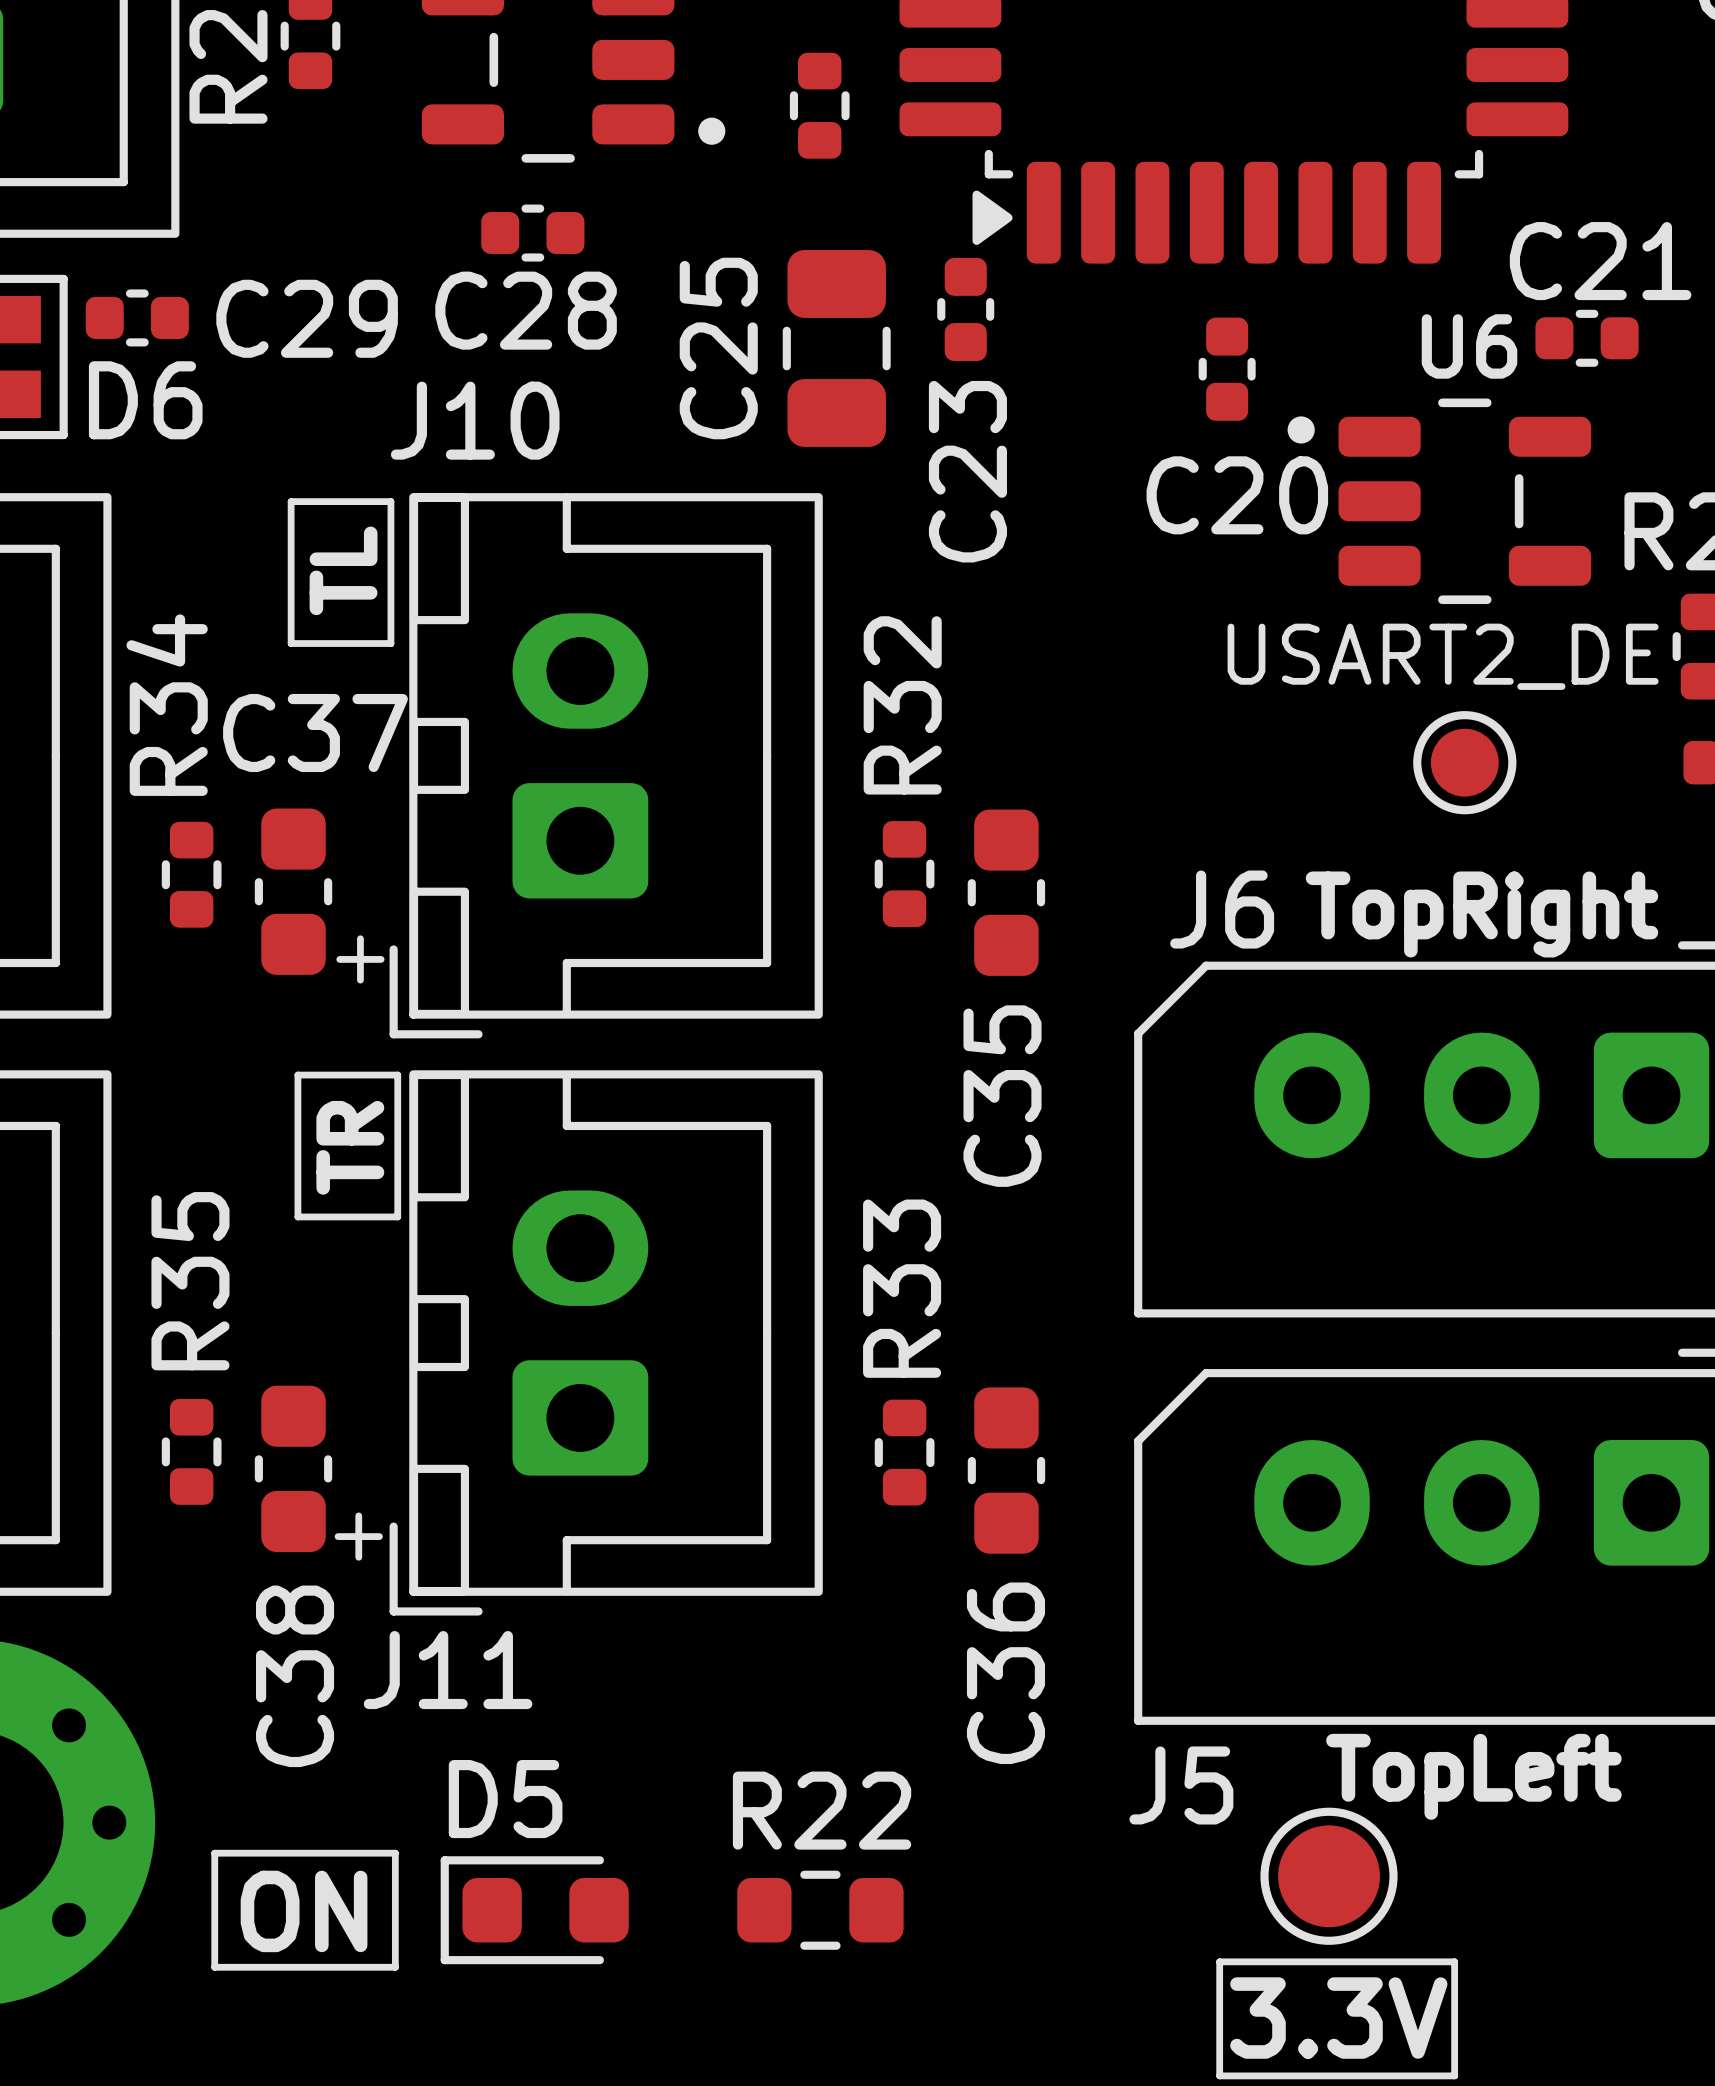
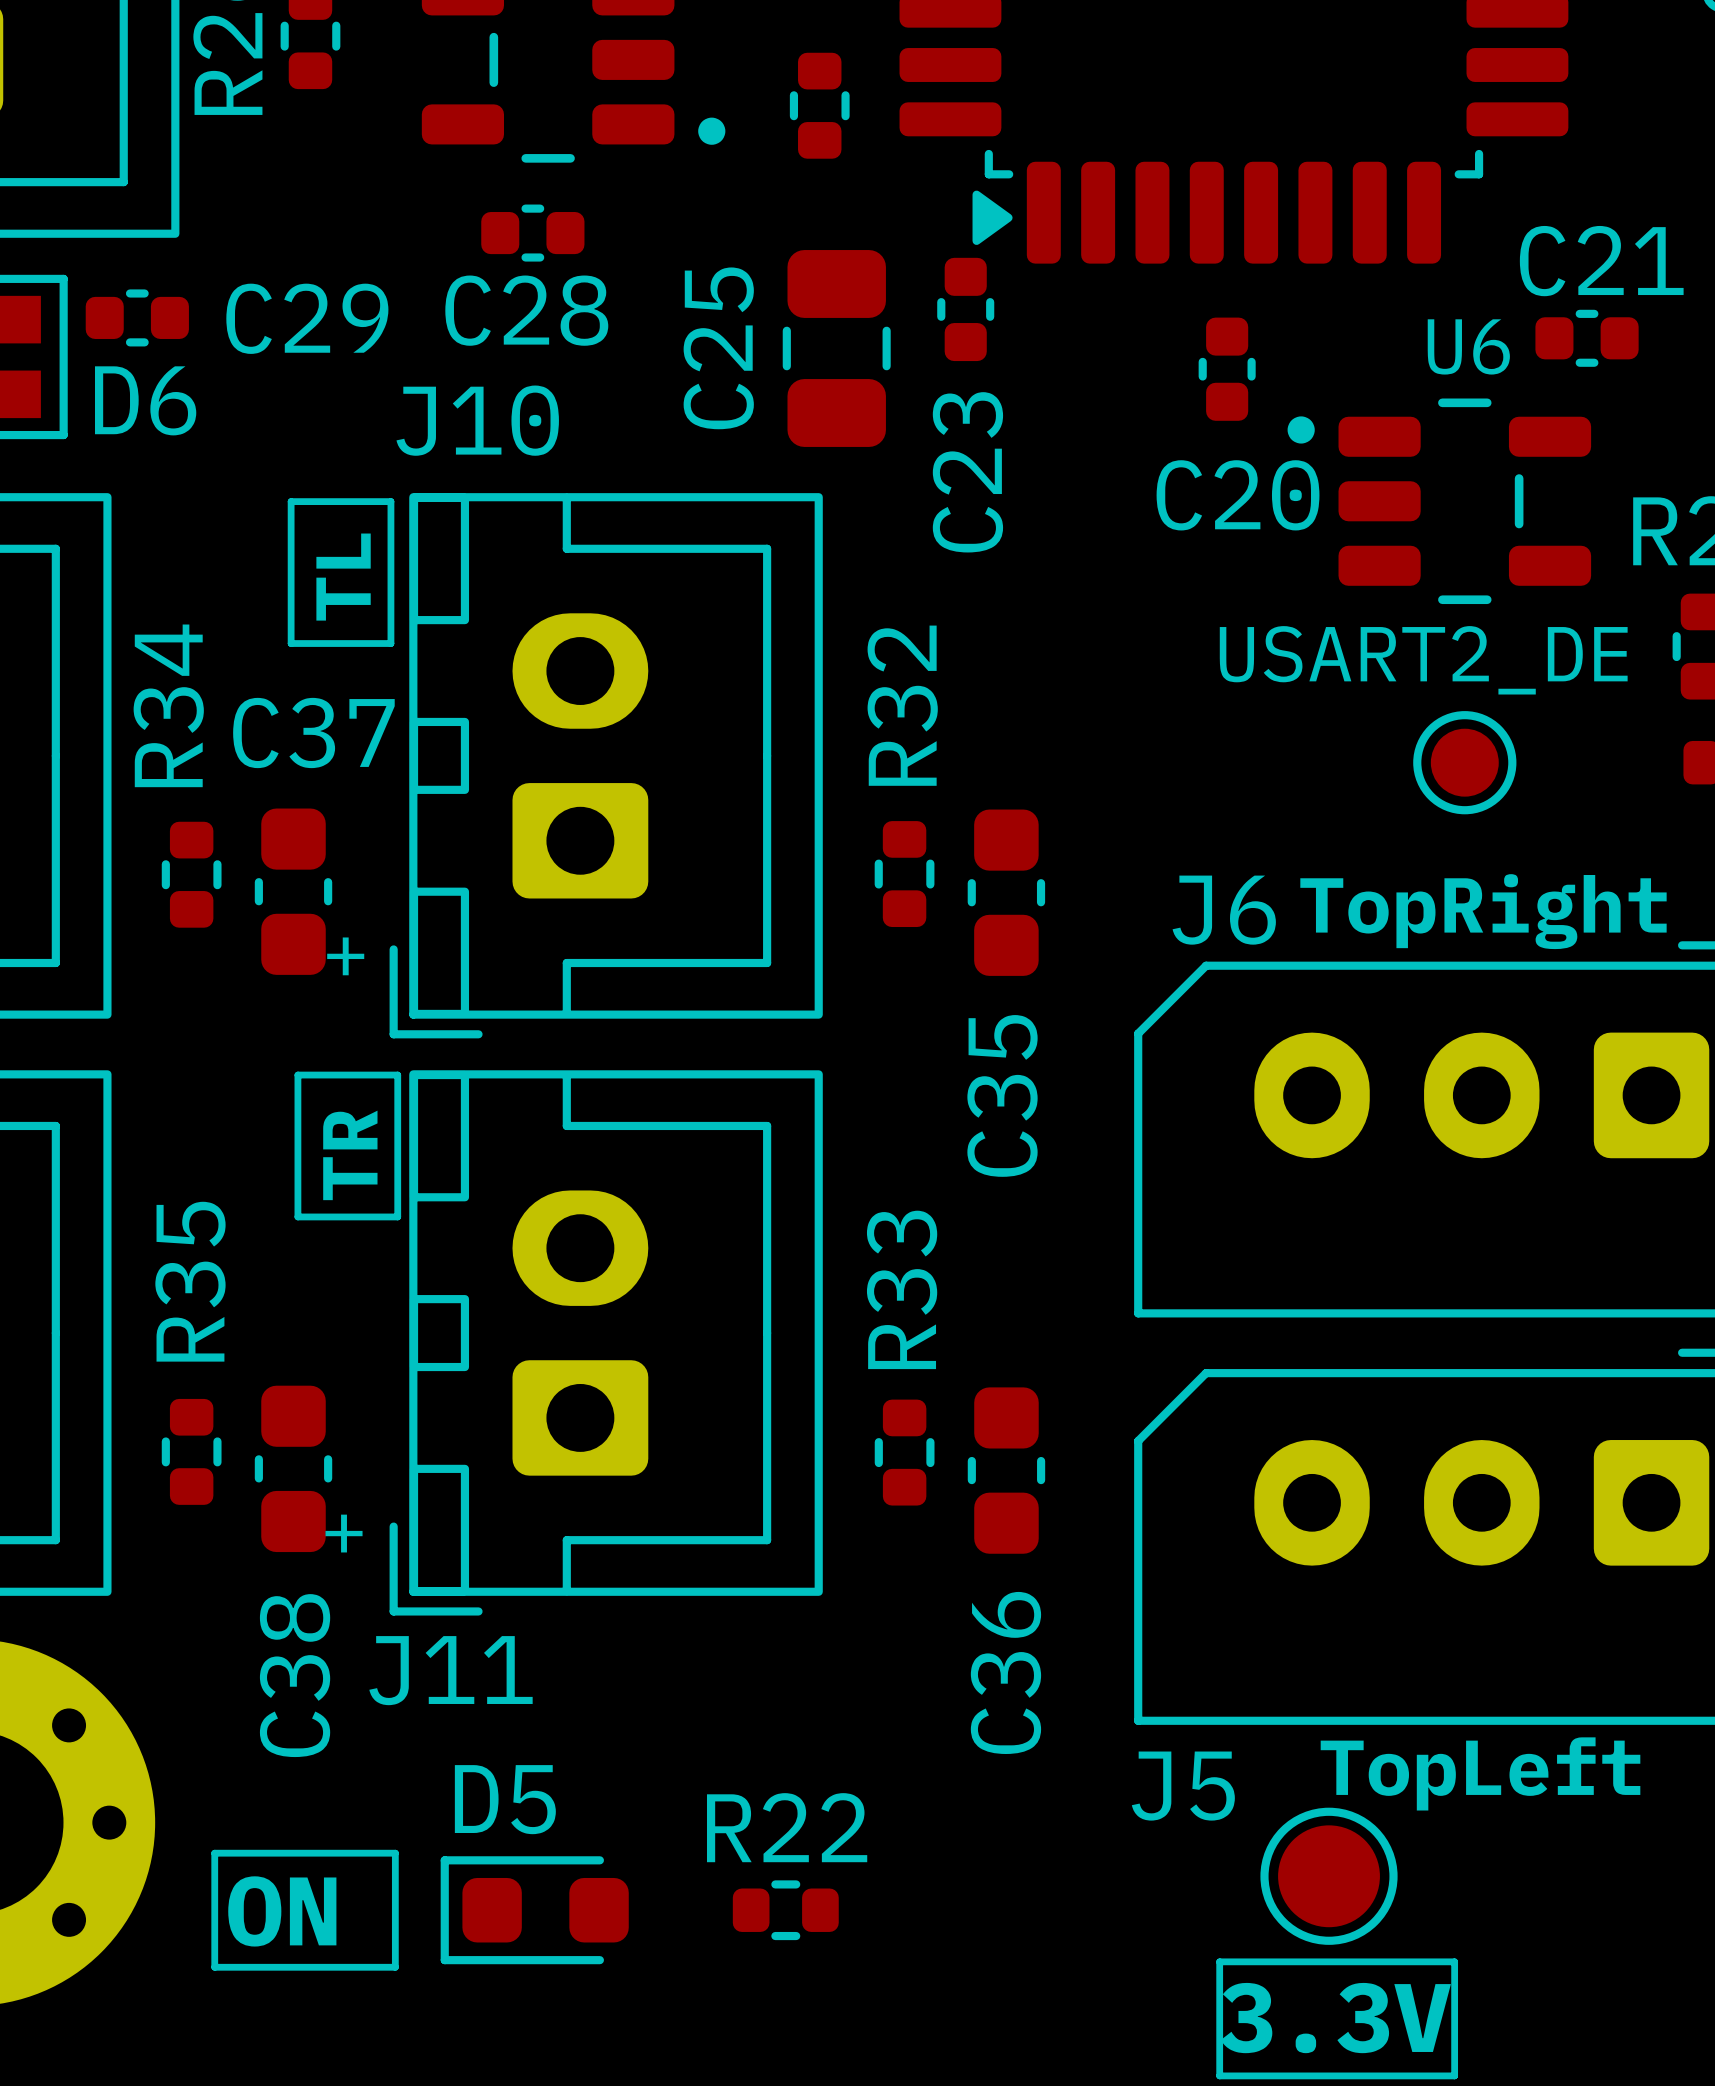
R22 name position: R22 (822, 1810) -> R22 (787, 1827)
R22 footprint: [737, 1870, 904, 1950] -> [732, 1880, 839, 1941]

